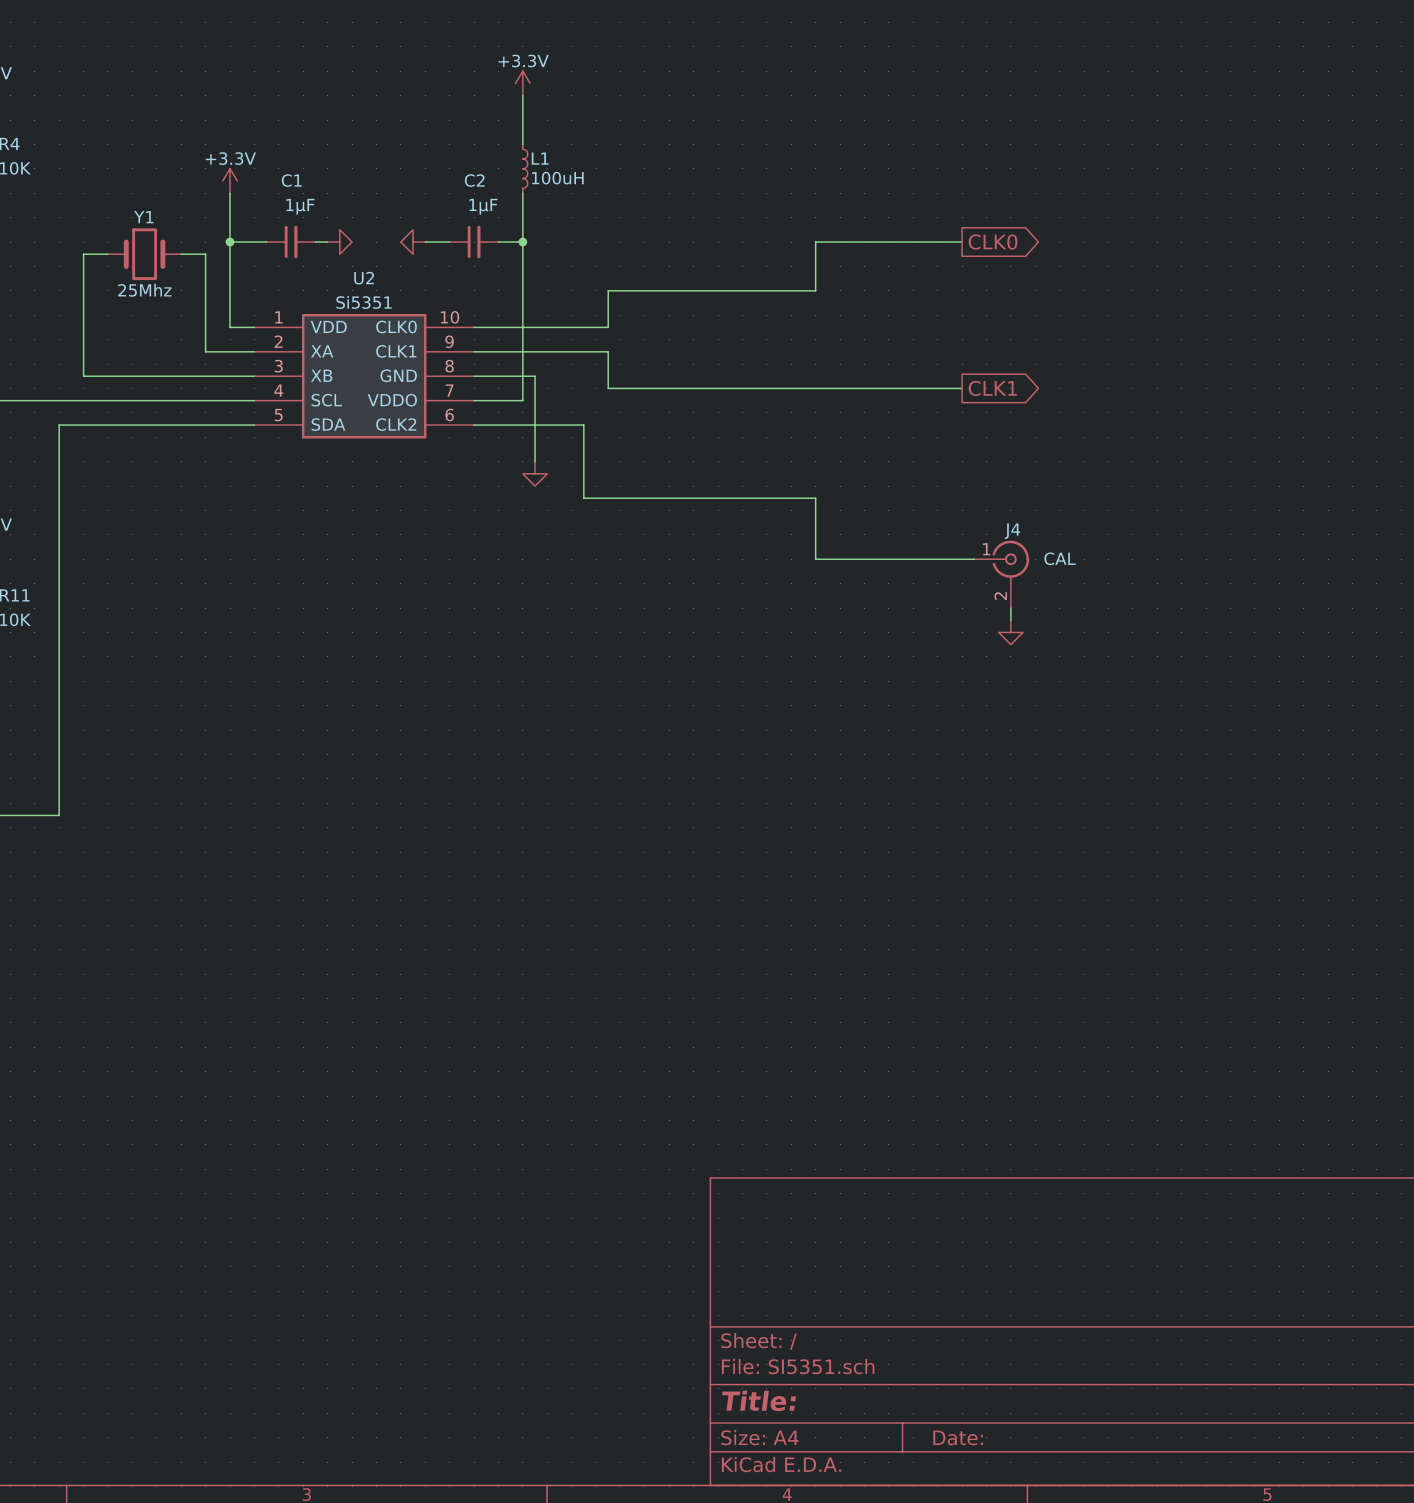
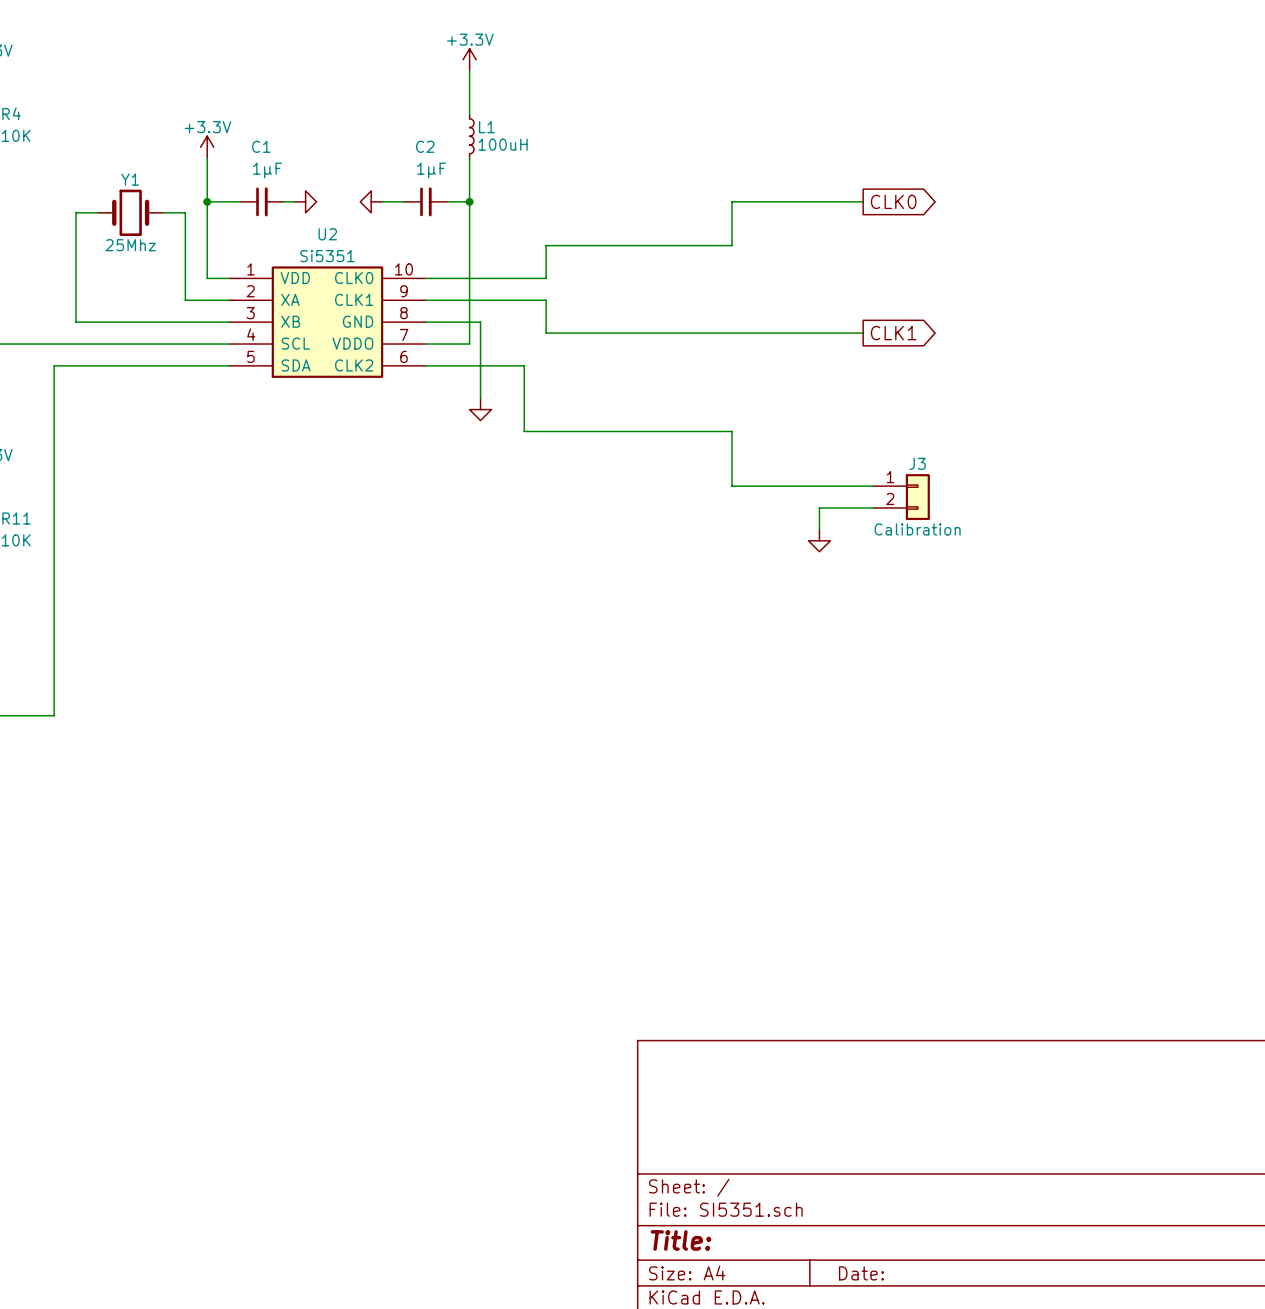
J3: none -> Calibration (901, 497)
J4: CAL (1001, 574) -> none
wire: none -> (874, 508) (819, 508) (819, 529)
wire: (1010, 608) (1010, 620) -> none
power symbol position: (1010, 632) -> (819, 540)

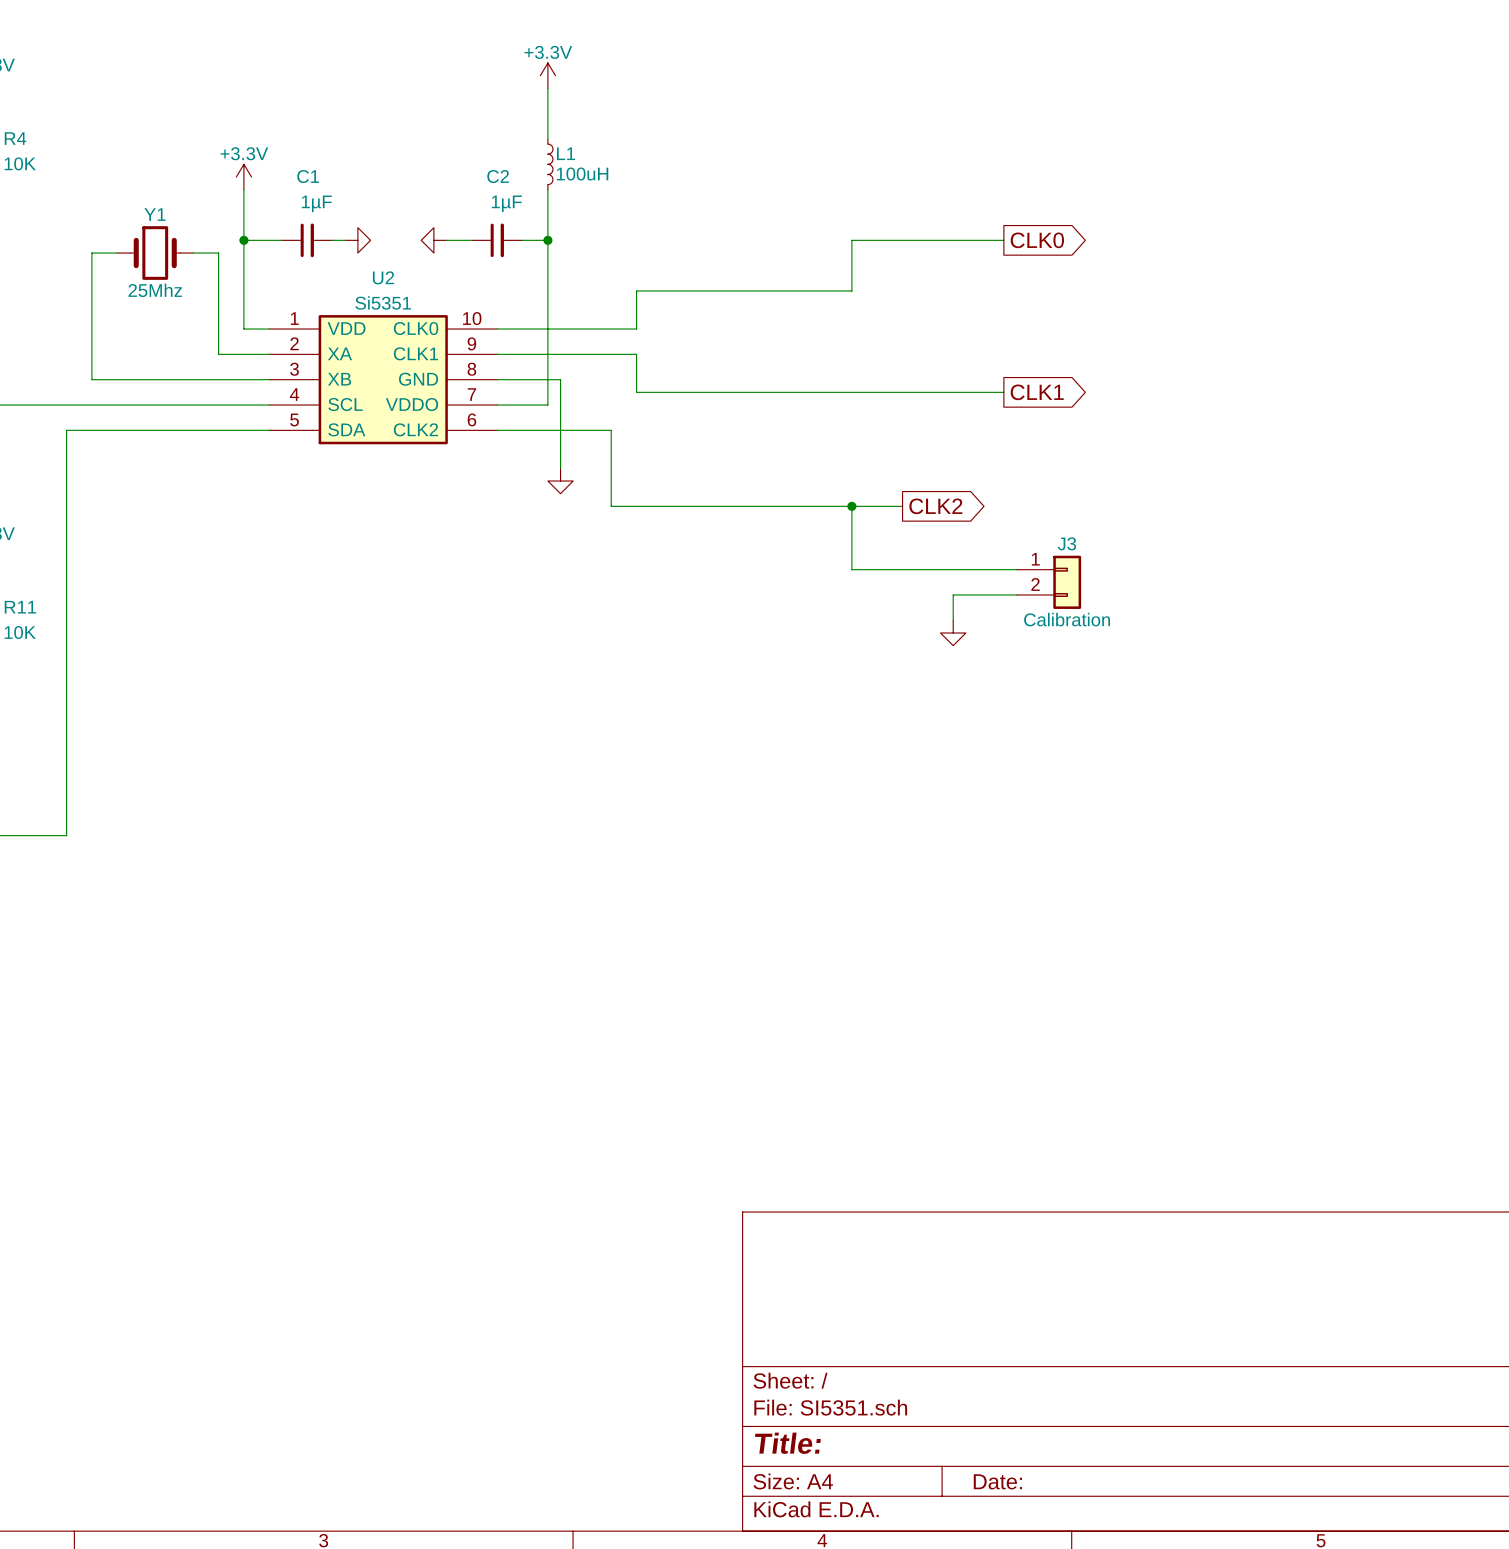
wire: none -> (851, 506) (902, 506)
junction: none -> (851, 506)
global label: none -> CLK2 (935, 506)

